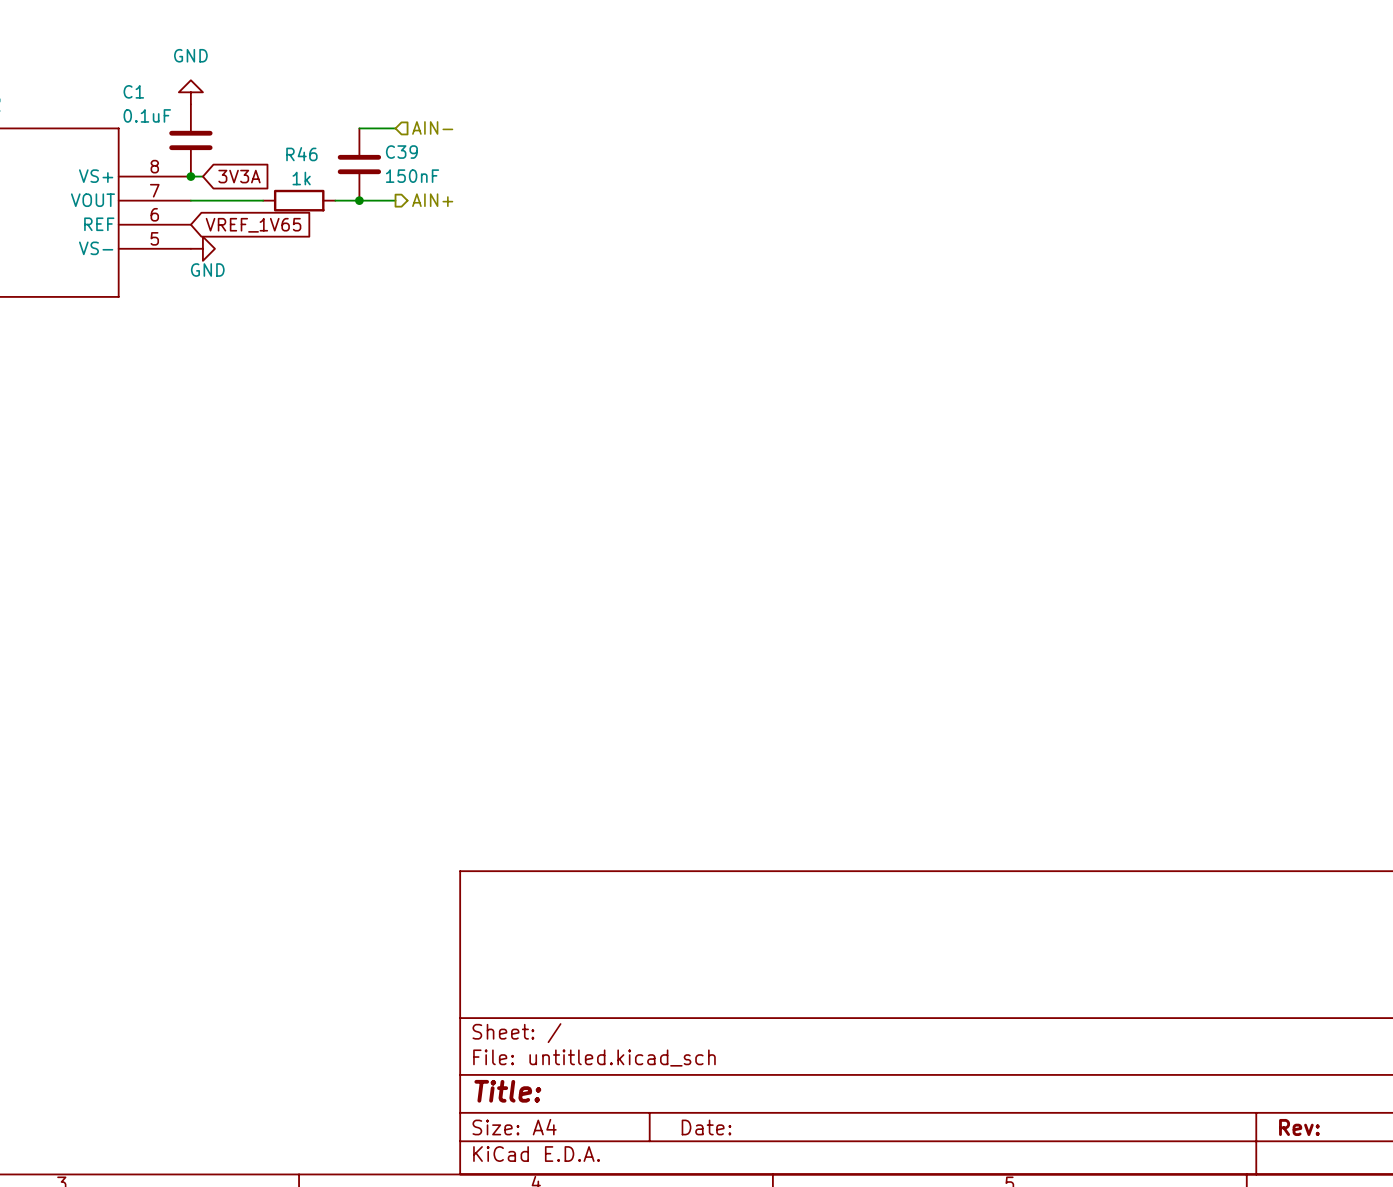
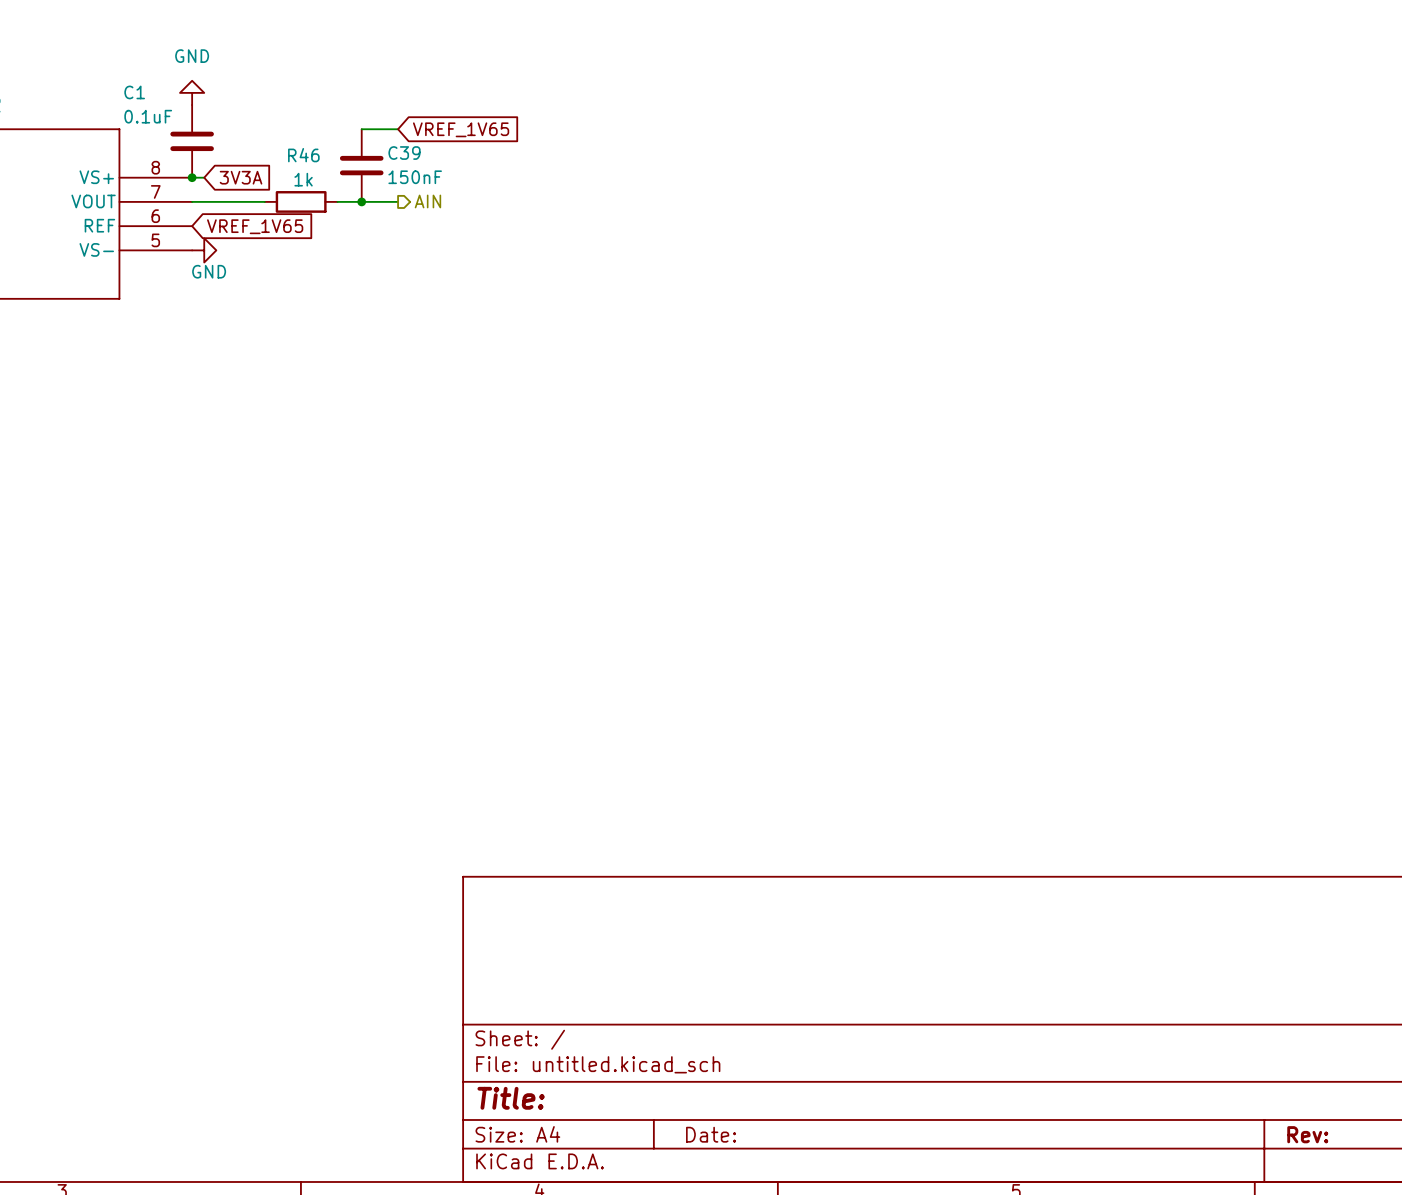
hierarchical label: AIN- (432, 127) -> none
global label: none -> VREF_1V65 (461, 129)
hierarchical label: AIN+ (432, 200) -> AIN (427, 201)

